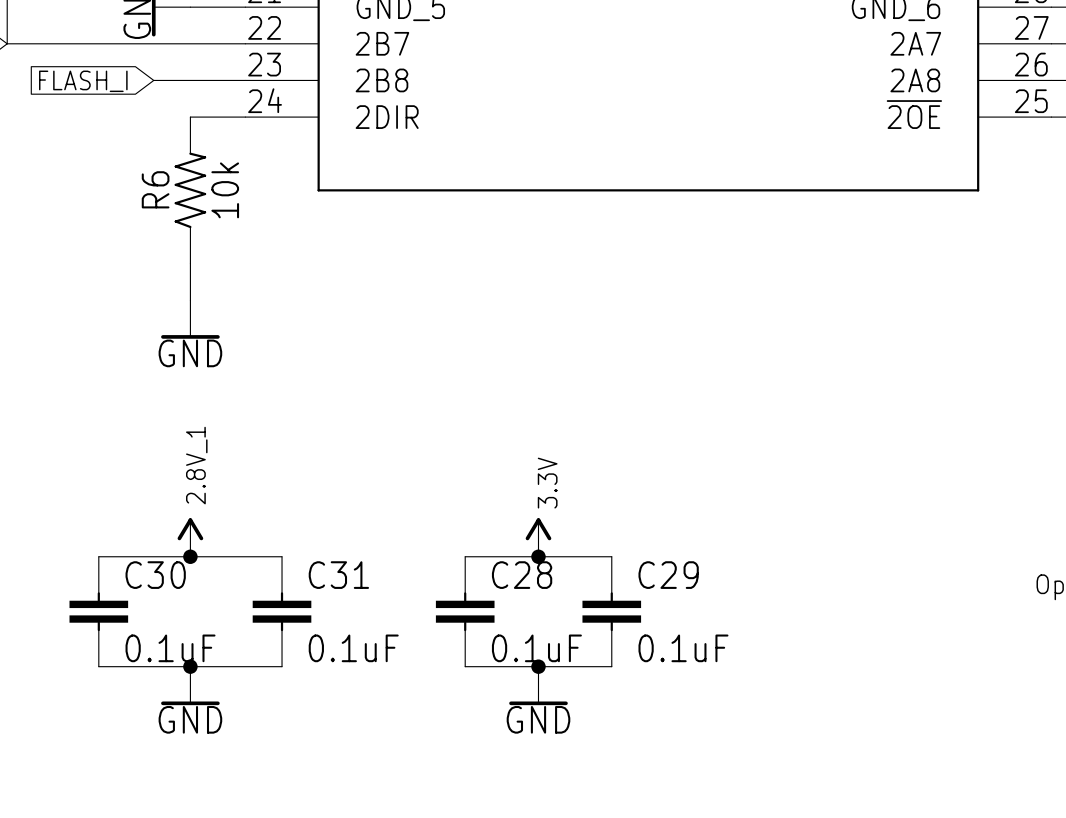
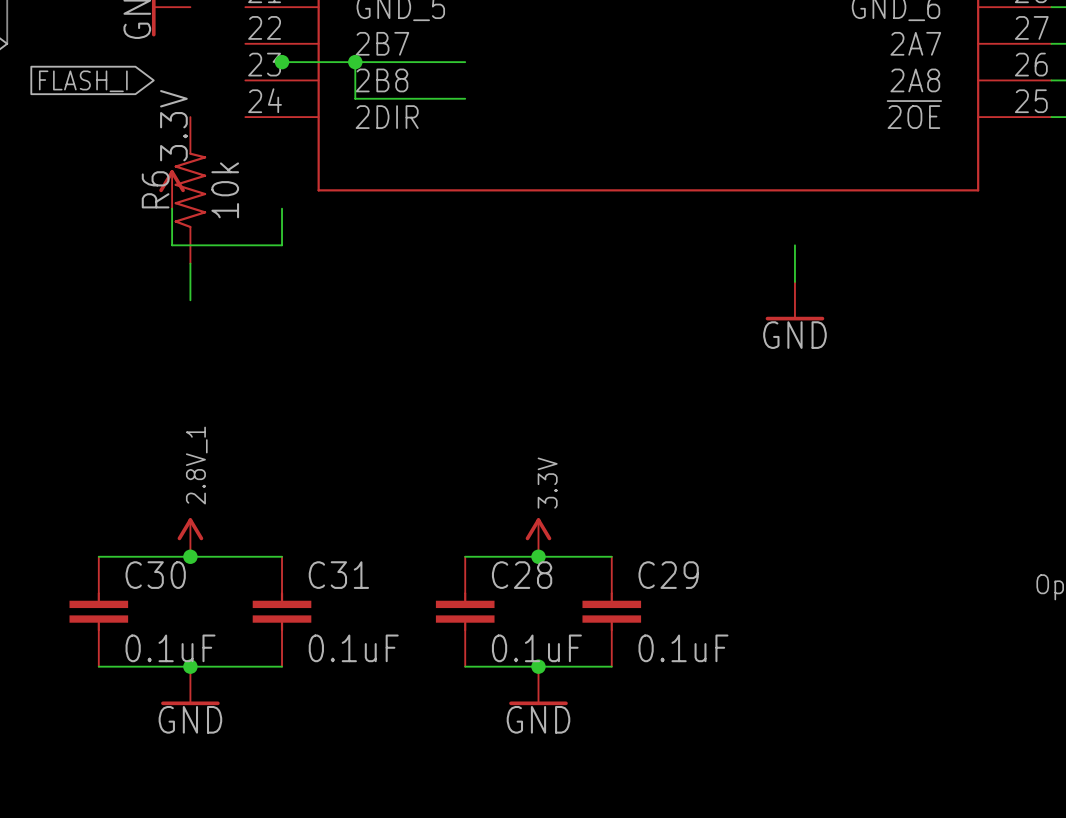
wire: (190, 7) (245, 7) -> none
wire: (7, 43) (245, 43) -> none
wire: none -> (282, 62) (465, 62)
junction: none -> (282, 62)
wire: none -> (355, 62) (355, 98) (465, 98)
junction: none -> (355, 62)
wire: (153, 80) (245, 80) -> none
wire: (190, 117) (245, 117) -> none
power symbol: none -> 3.3V (172, 189)
wire: none -> (172, 208) (172, 245) (282, 245) (282, 208)
wire: none -> (794, 245) (794, 281)
power symbol: none -> GND (794, 301)
power symbol: GND (190, 319) -> none

